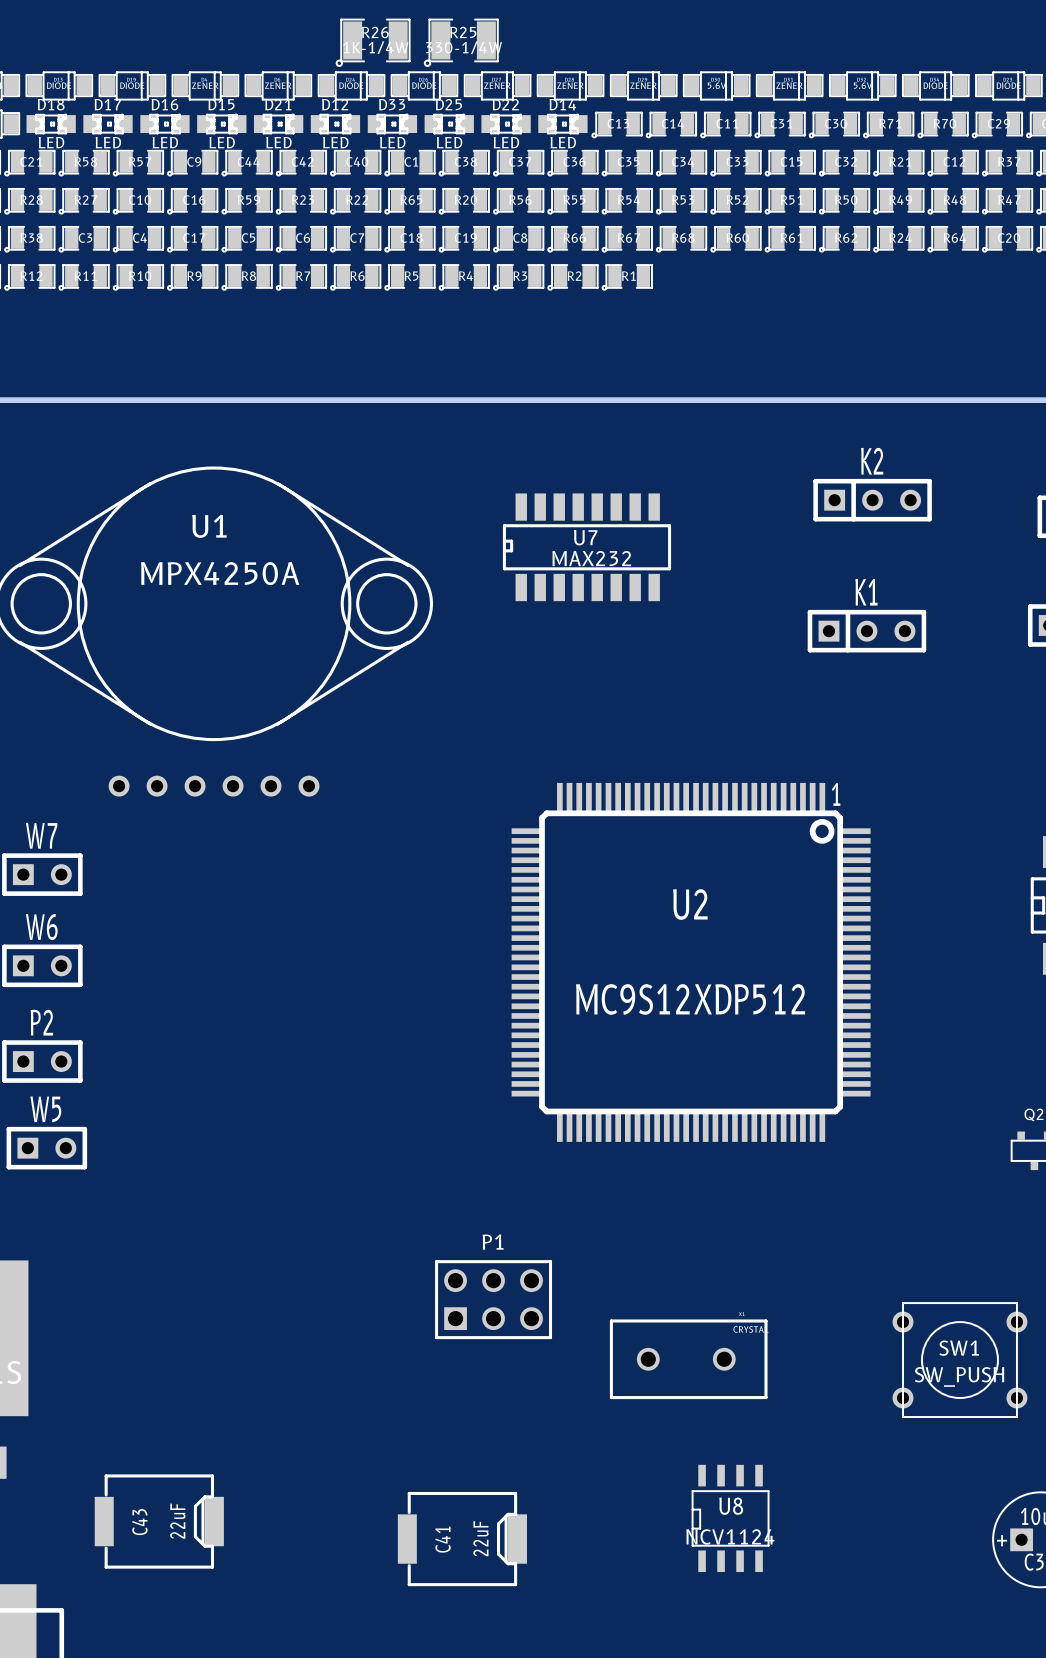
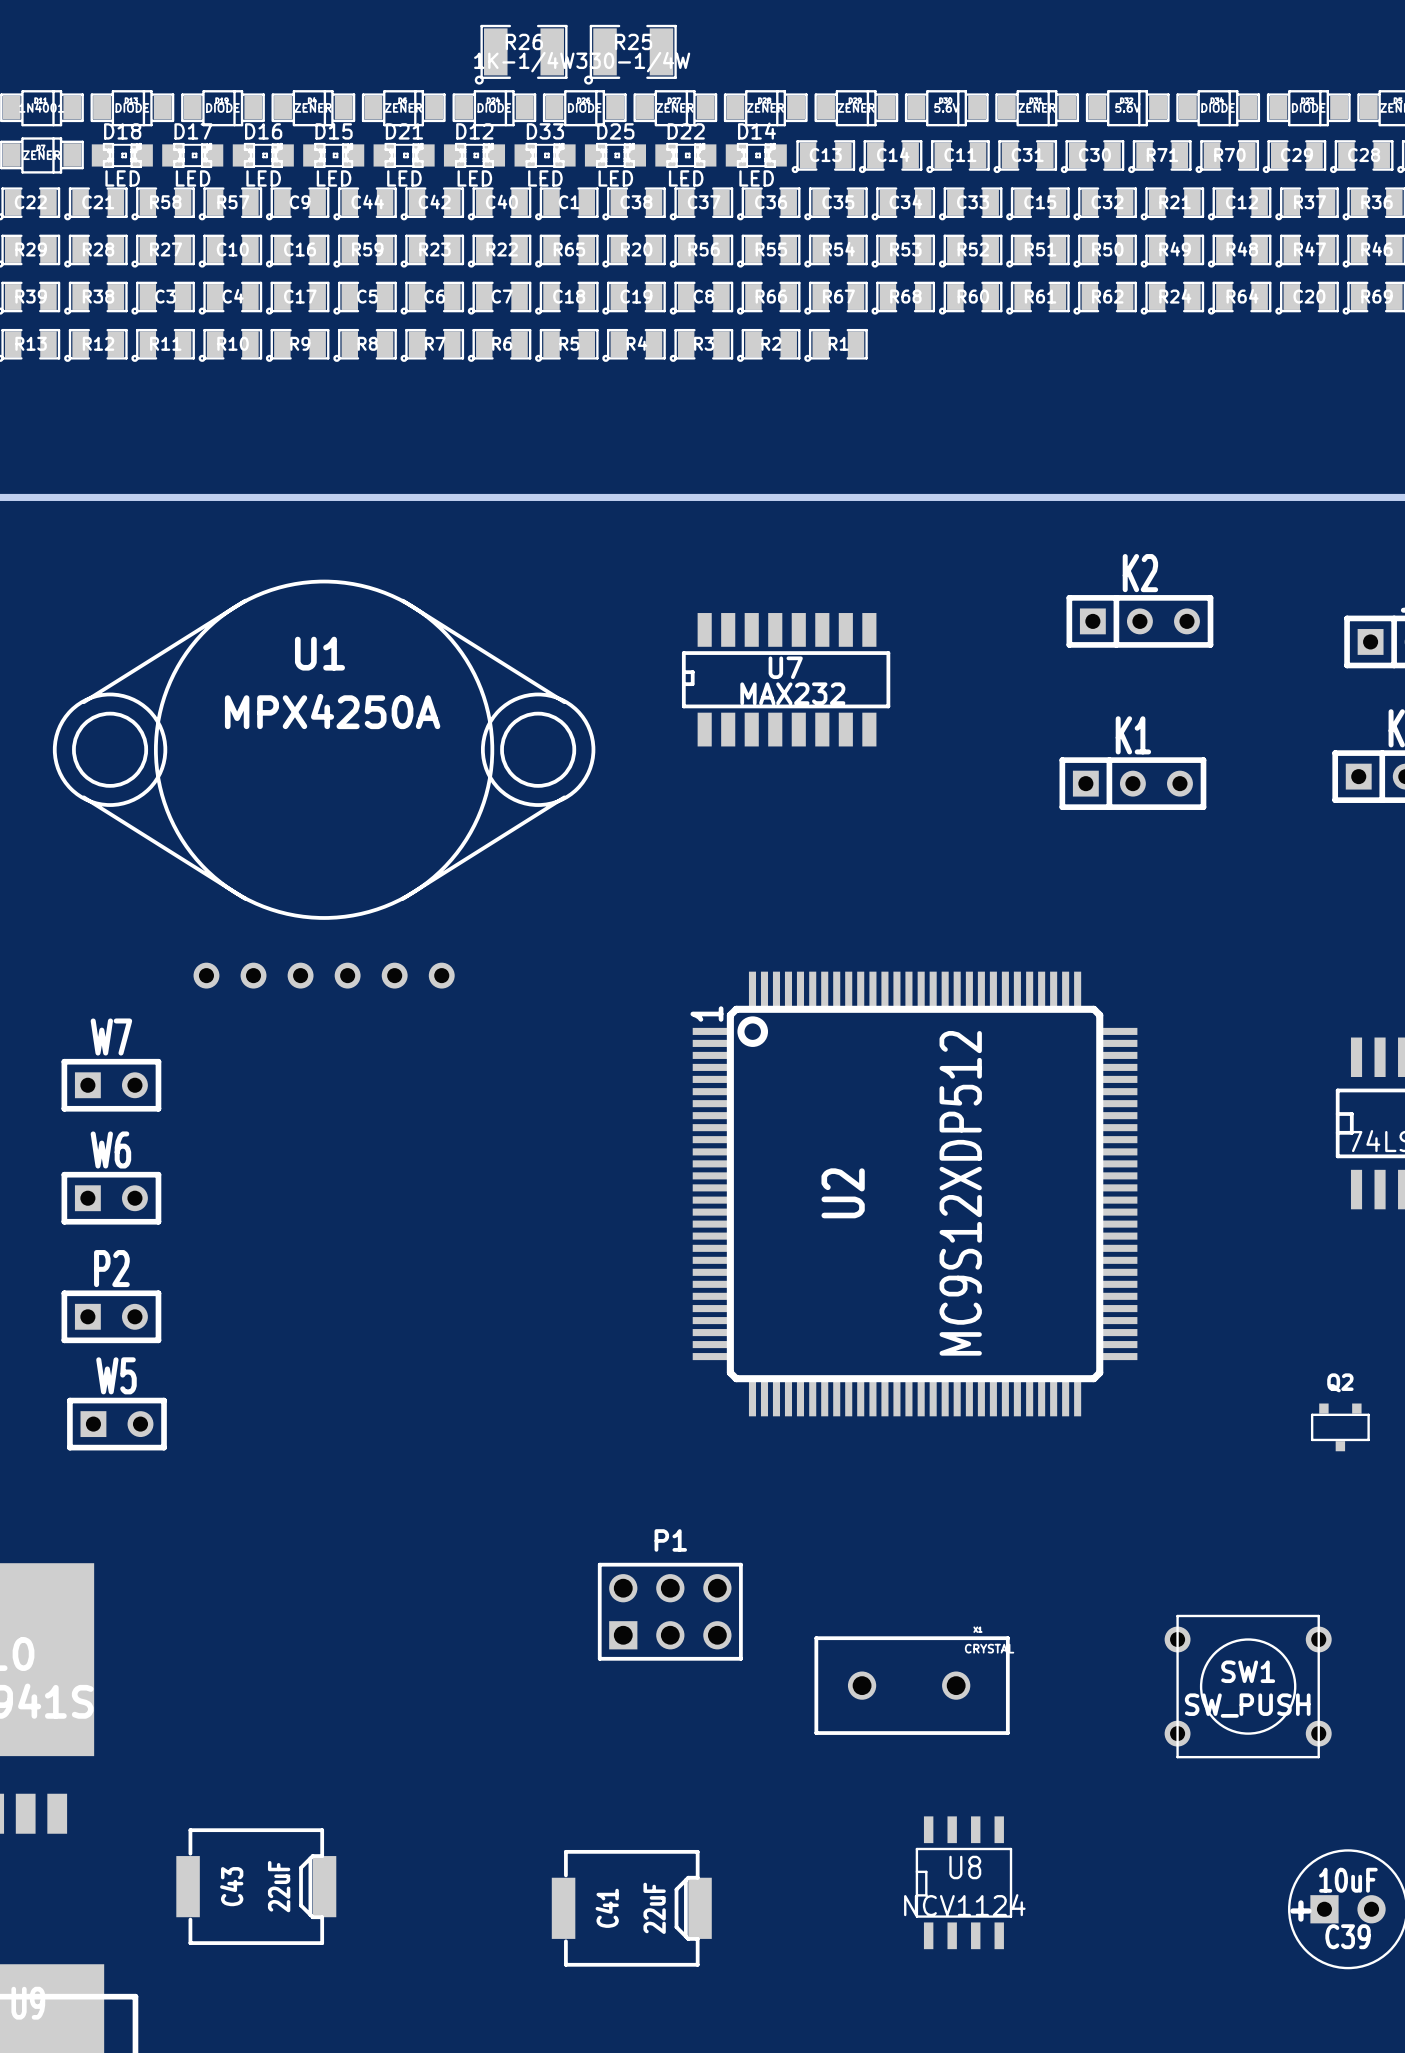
U2 rotation: 0° (691, 962) -> 90° counterclockwise (915, 1193)

